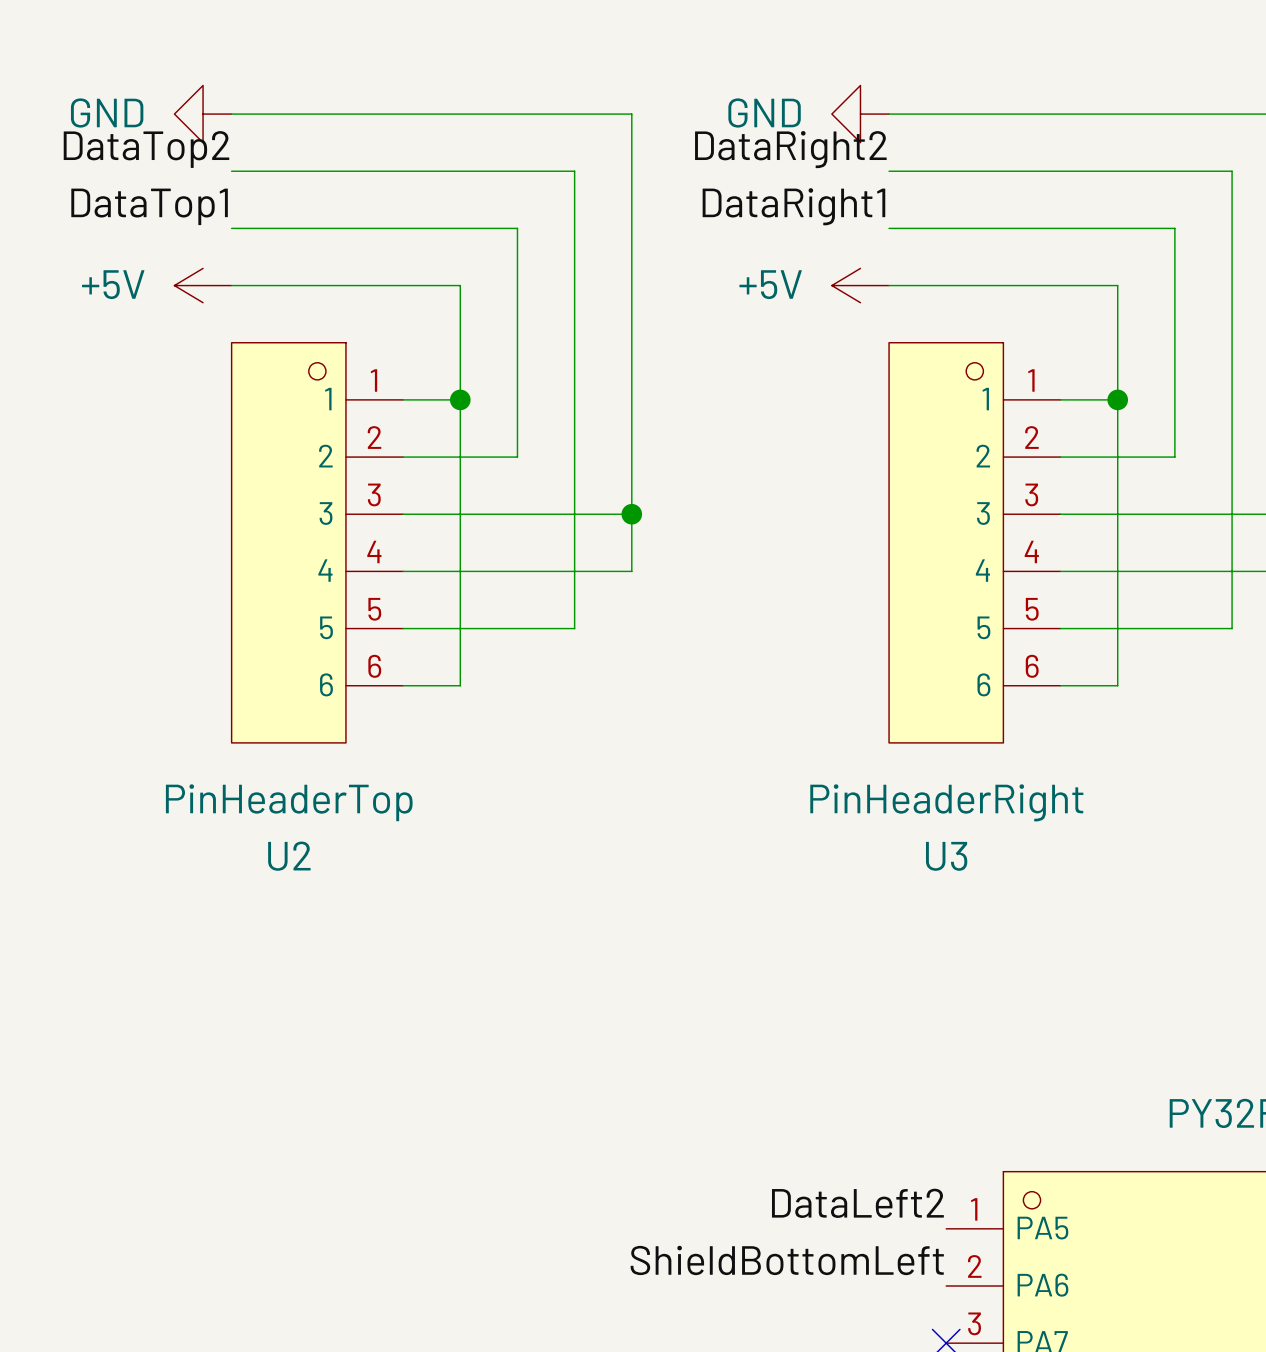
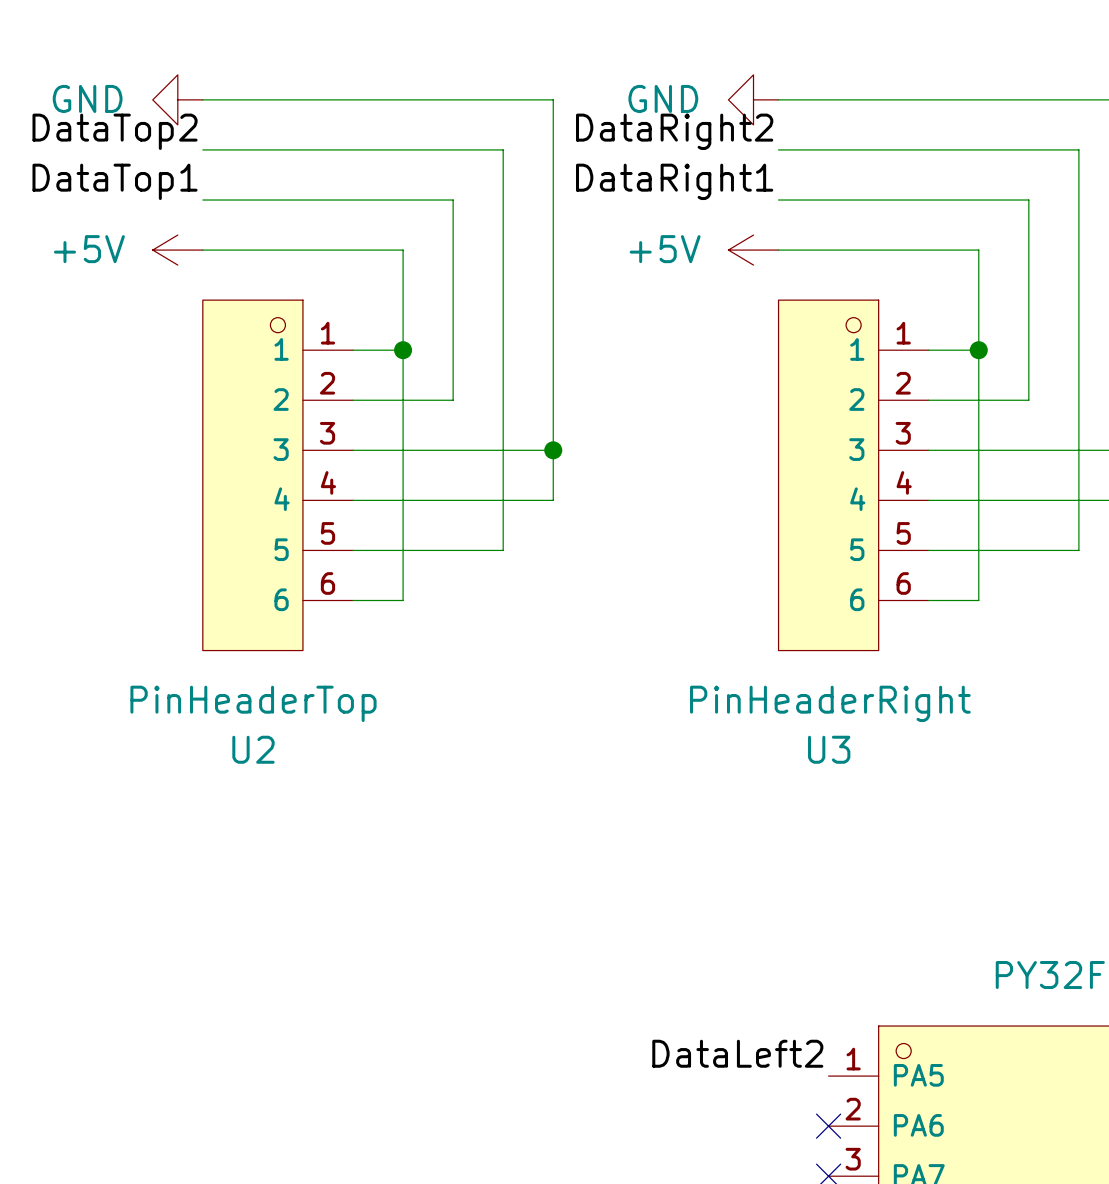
label: ShieldBottomLeft (787, 1260) -> none
no-connect mark: none -> (828, 1126)

